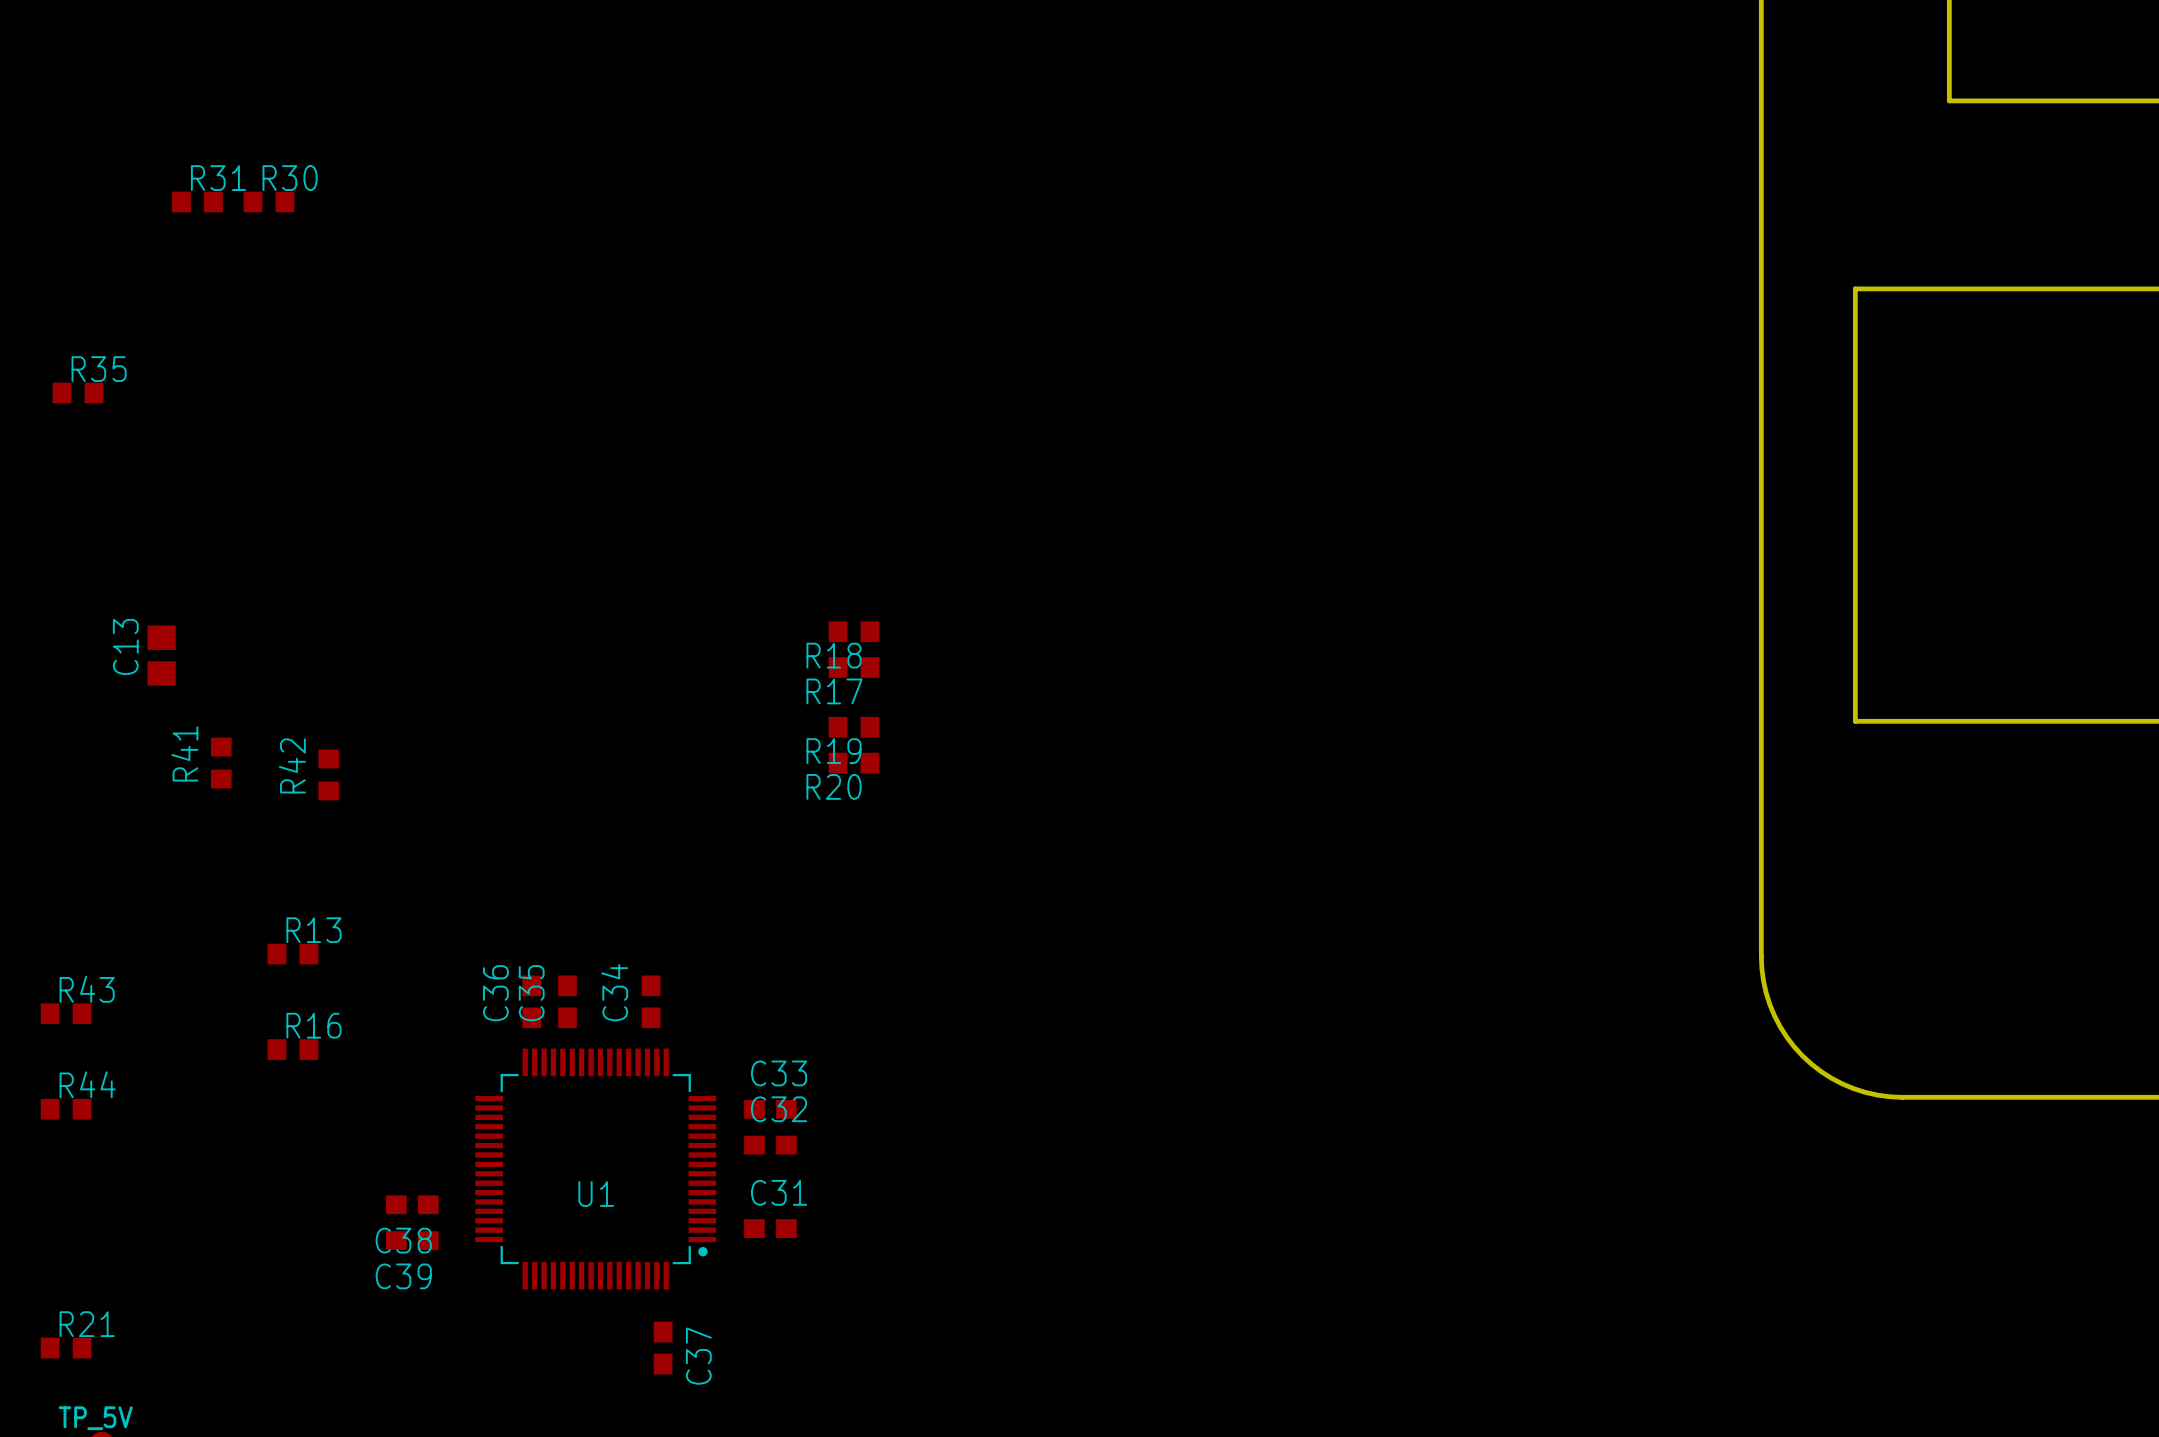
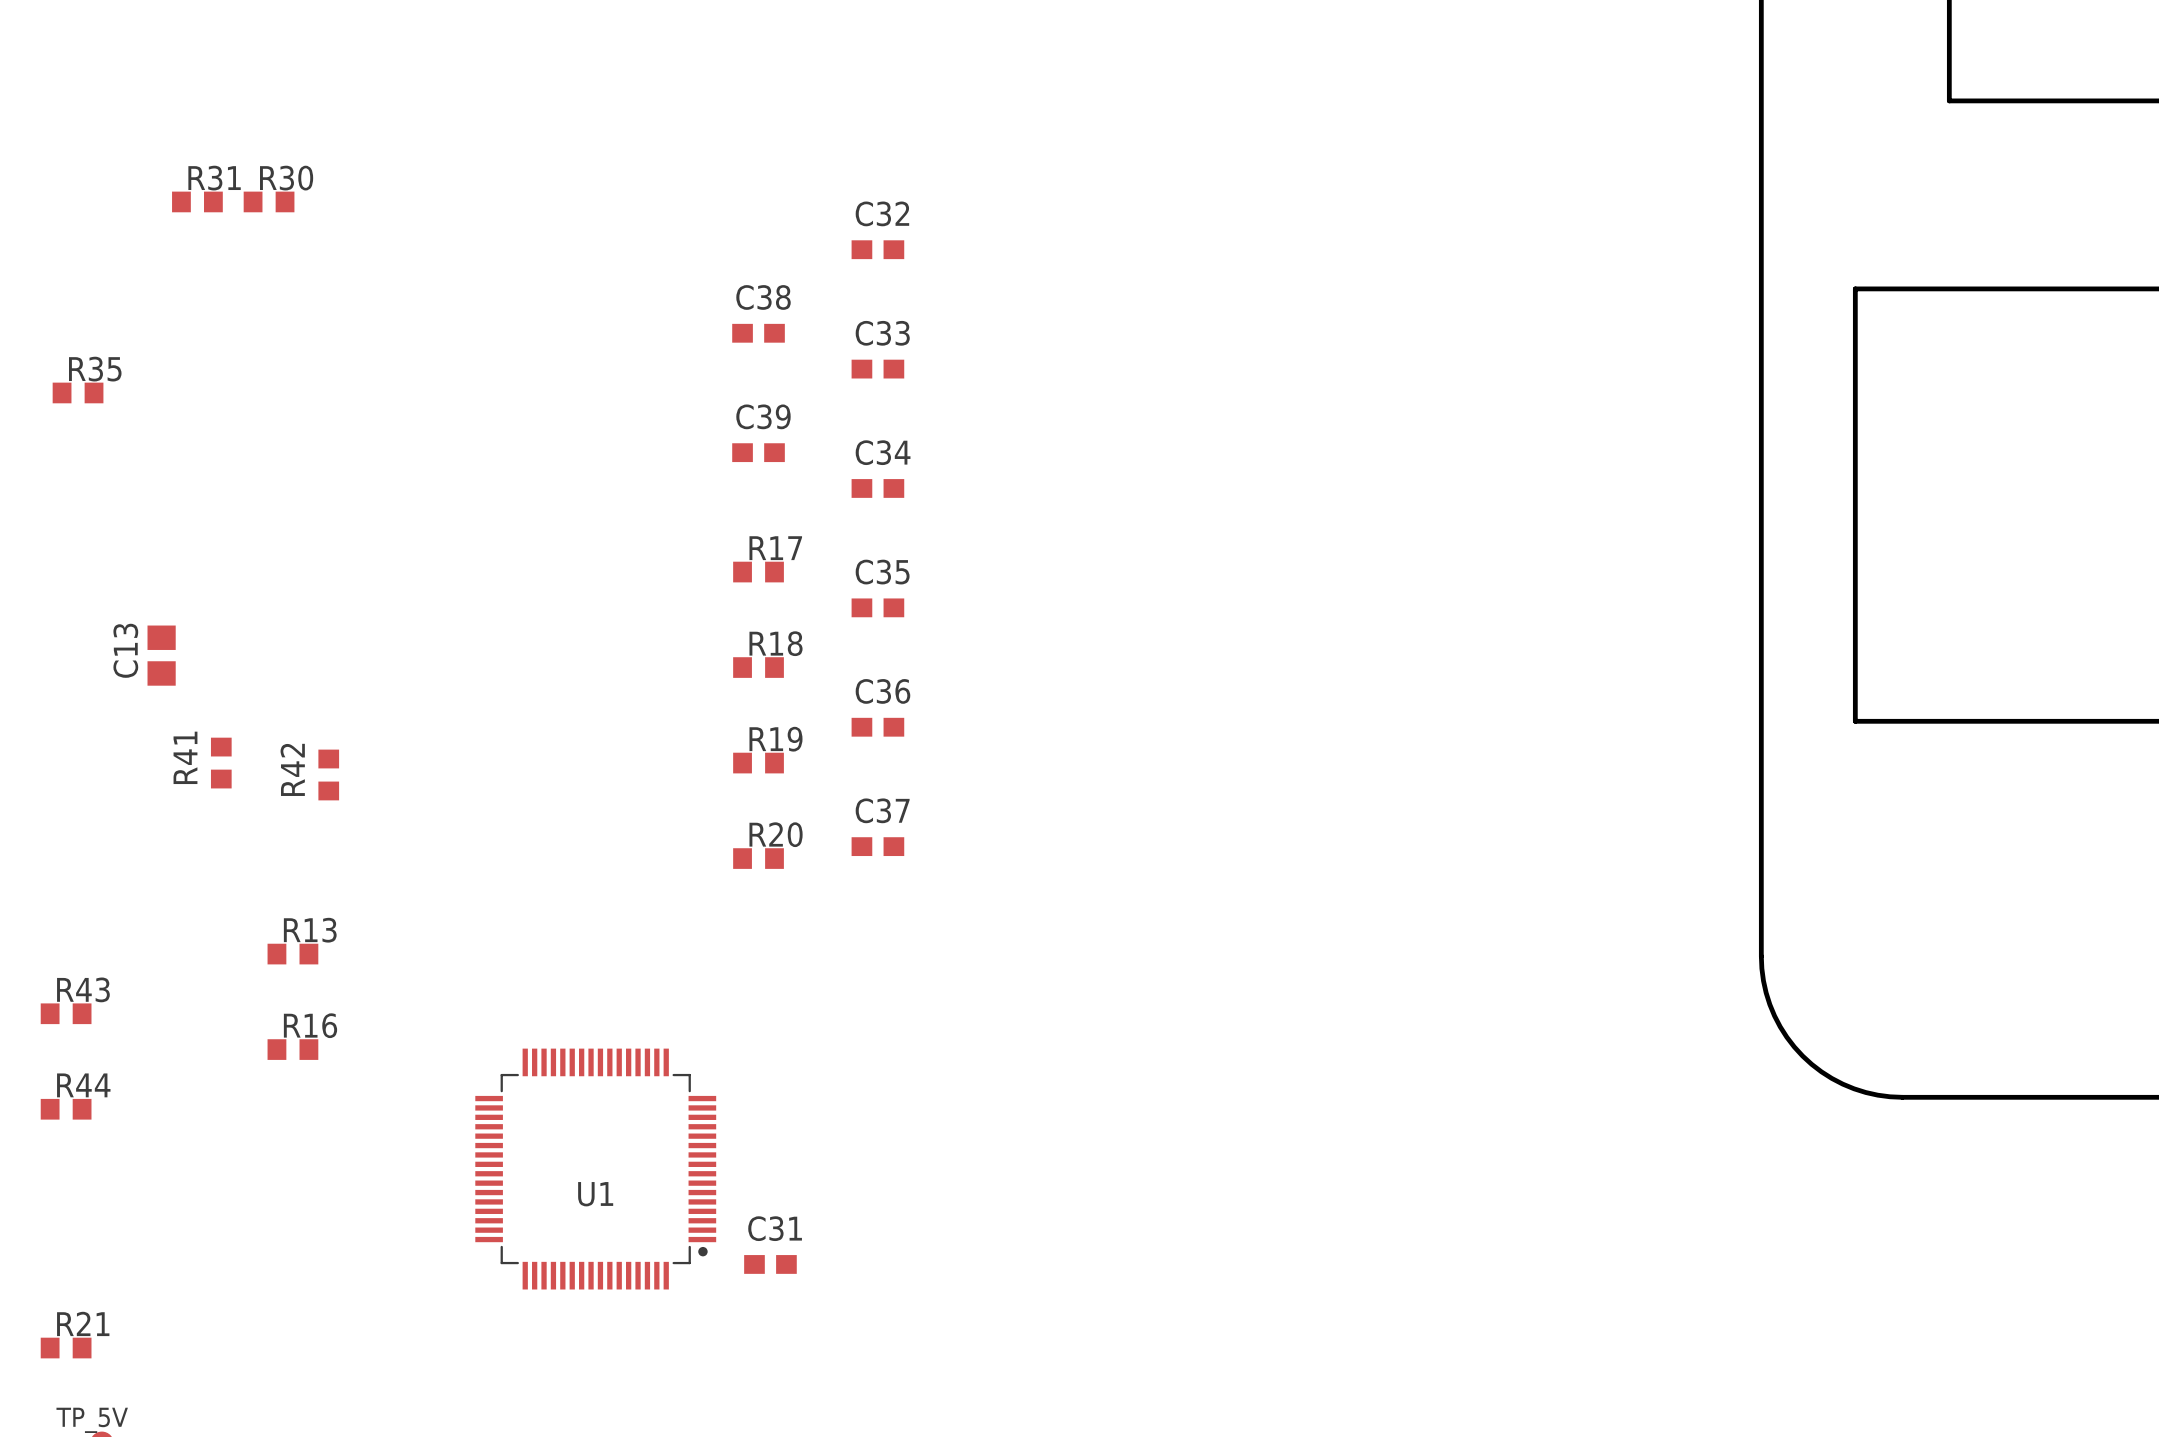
R18 position: (854, 631) -> (758, 667)
R18 name position: R18 (834, 655) -> R18 (776, 643)
R17 position: (854, 667) -> (758, 572)
R17 name position: R17 (834, 691) -> R17 (775, 548)
R19 position: (854, 727) -> (758, 763)
R19 name position: R19 (834, 751) -> R19 (775, 739)
R20 position: (854, 763) -> (758, 858)
R20 name position: R20 (834, 786) -> R20 (776, 834)
C36 rotation: 0° (531, 1001) -> 90° clockwise (877, 727)
C36 position: (531, 1001) -> (877, 727)
C35 rotation: 0° (567, 1001) -> 90° clockwise (877, 607)
C35 position: (567, 1001) -> (877, 607)
C34 rotation: 0° (651, 1001) -> 90° clockwise (877, 488)
C34 position: (651, 1001) -> (877, 488)
C33 position: (770, 1109) -> (877, 369)
C32 position: (770, 1145) -> (877, 249)
C38 position: (412, 1204) -> (758, 333)
C31 position: (770, 1228) -> (770, 1264)
C38 name position: C38 (403, 1240) -> C38 (763, 297)
C39 position: (412, 1240) -> (758, 452)
C39 name position: C39 (403, 1276) -> C39 (763, 416)
C37 rotation: 0° (663, 1348) -> 90° clockwise (877, 846)
C37 position: (663, 1348) -> (877, 846)
C37 name position: C37 (698, 1356) -> C37 (882, 810)

